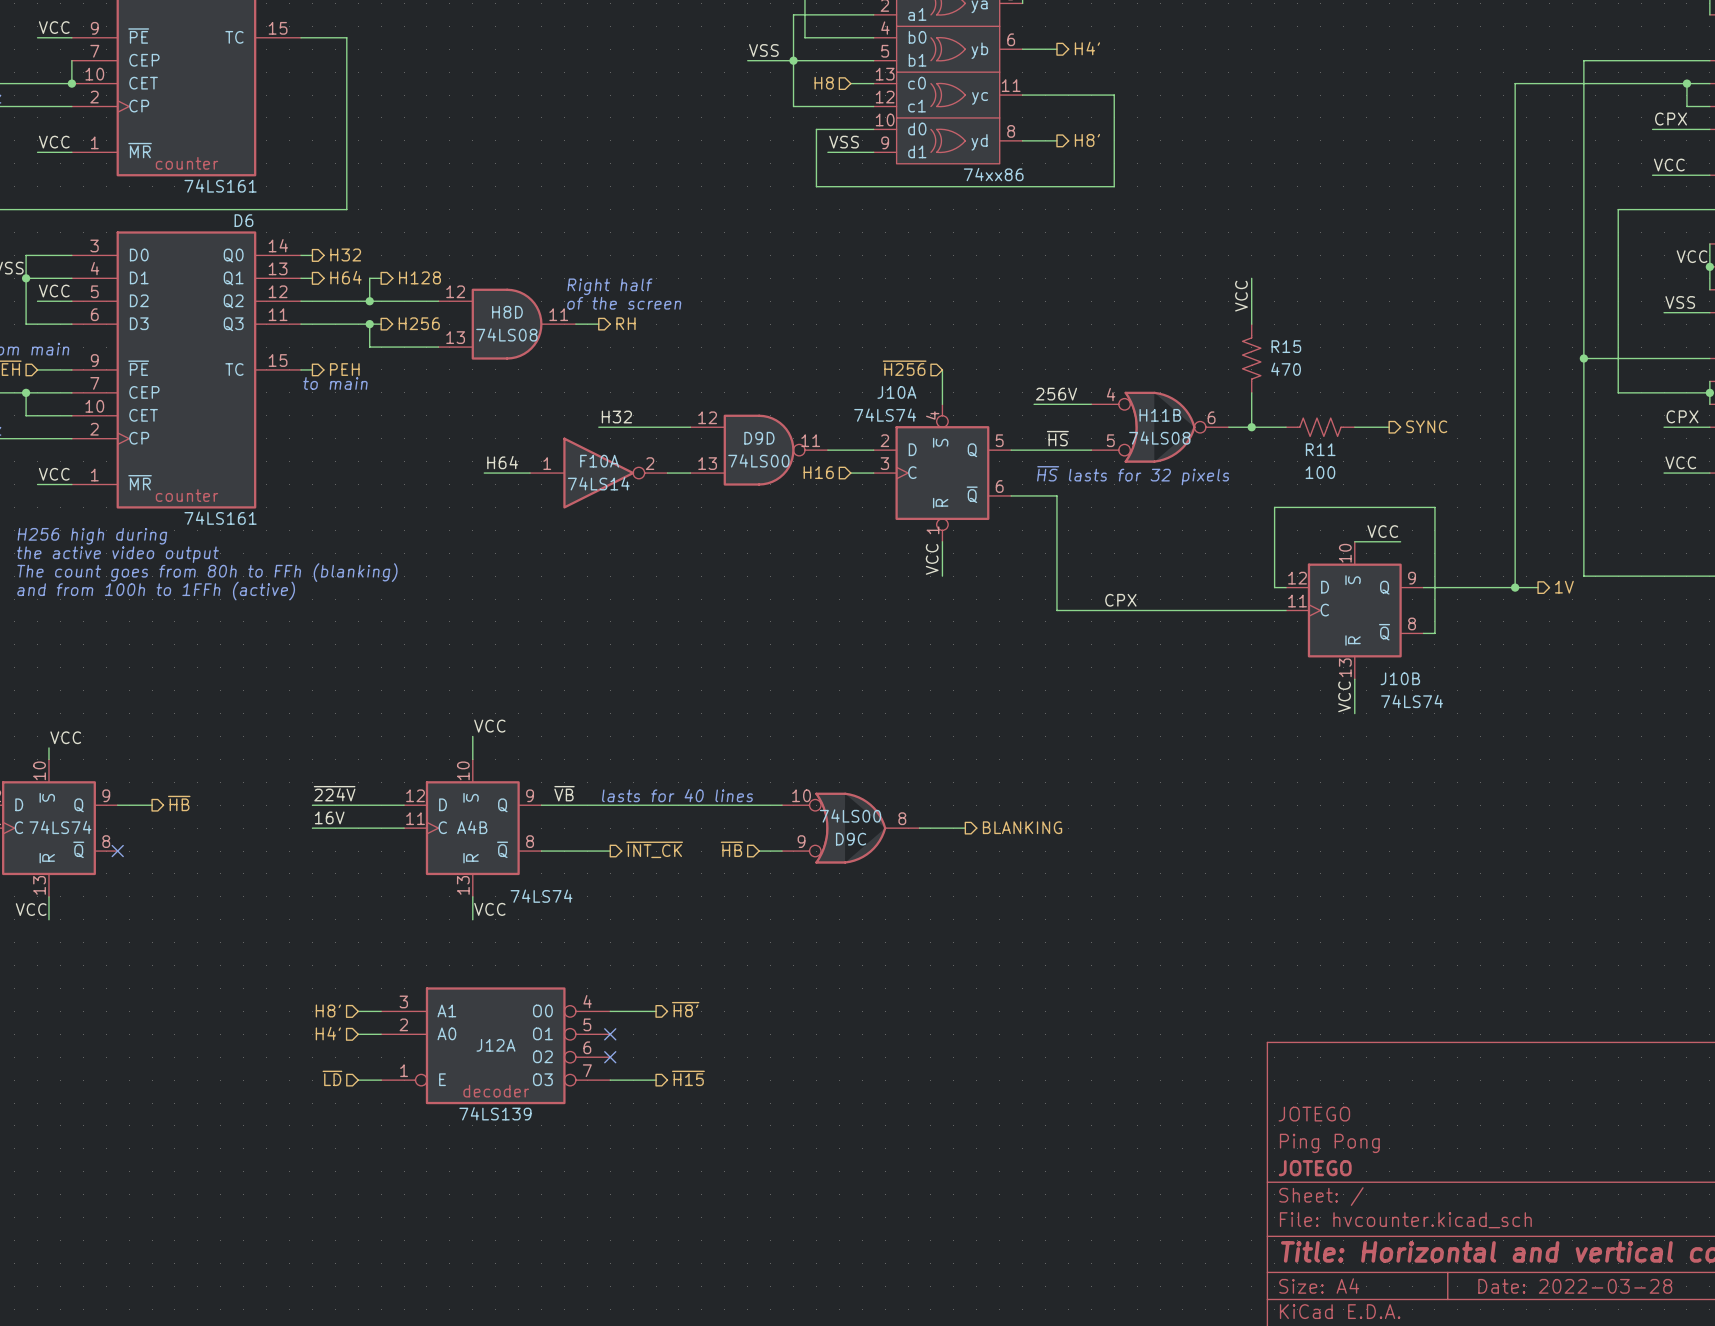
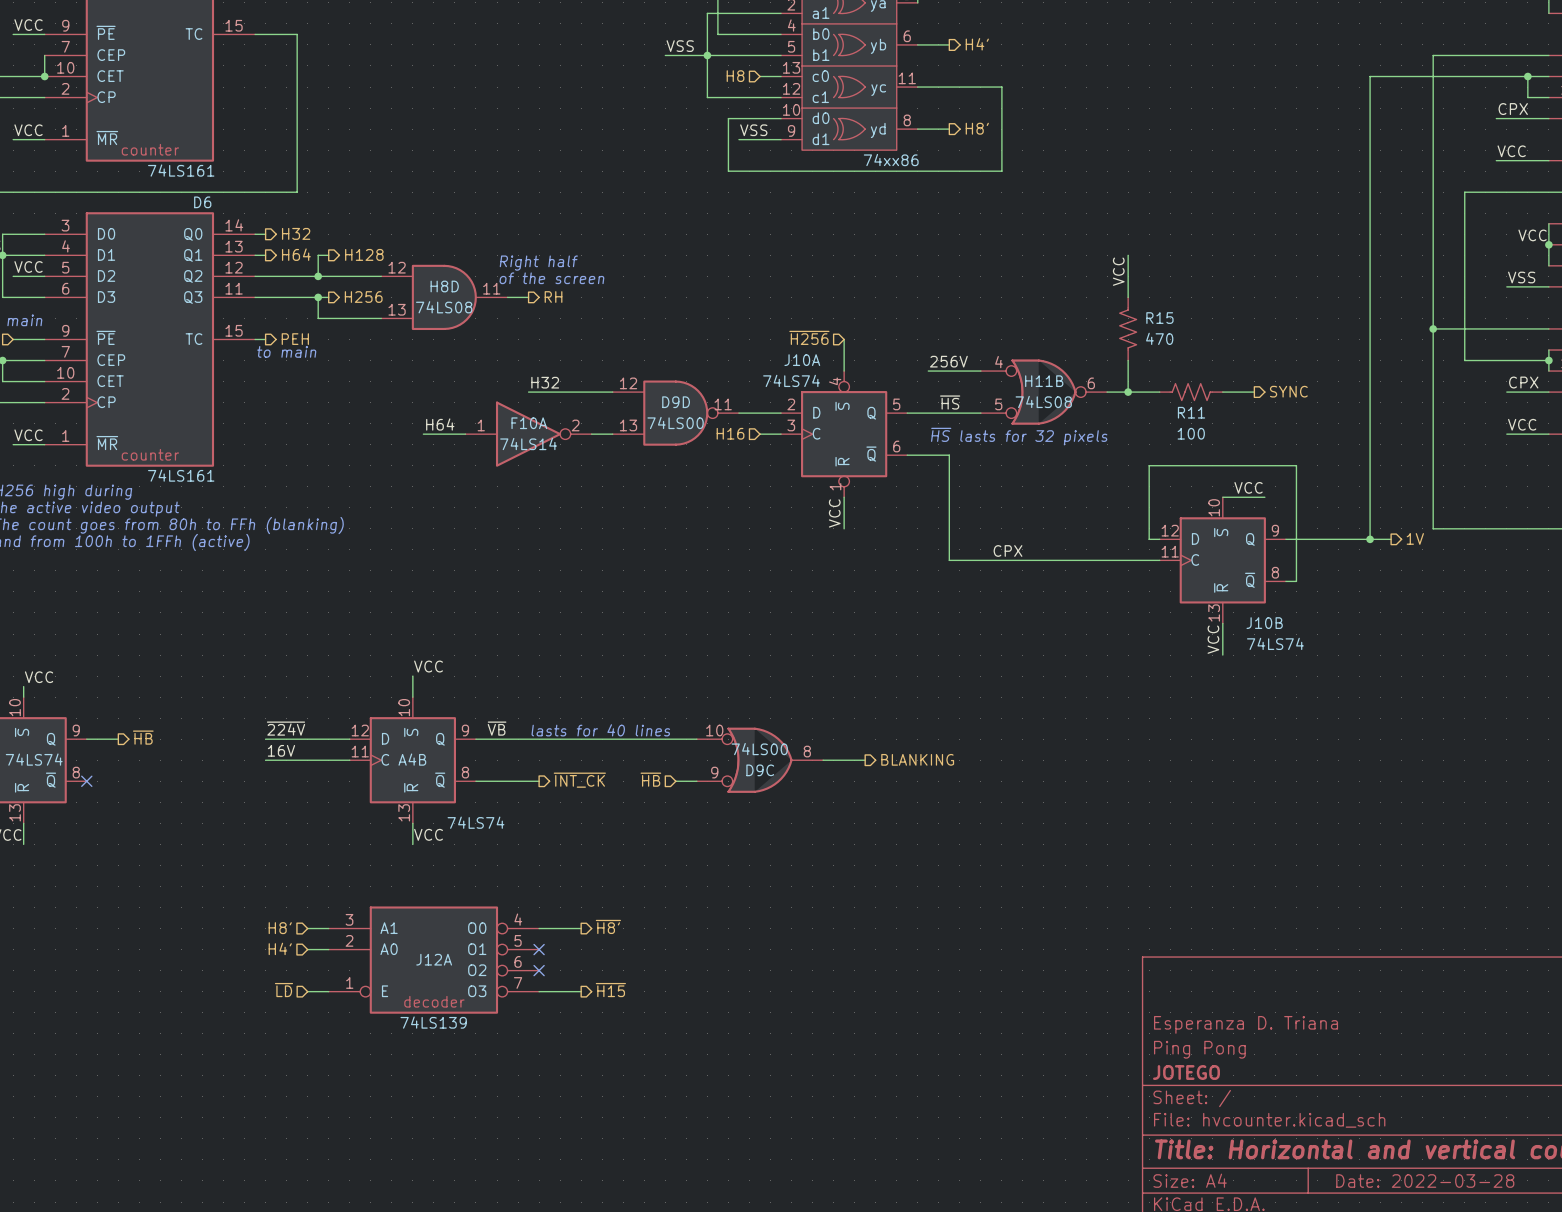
title block: JOTEGO (1314, 1114) -> Esperanza D. Triana (1246, 1024)

